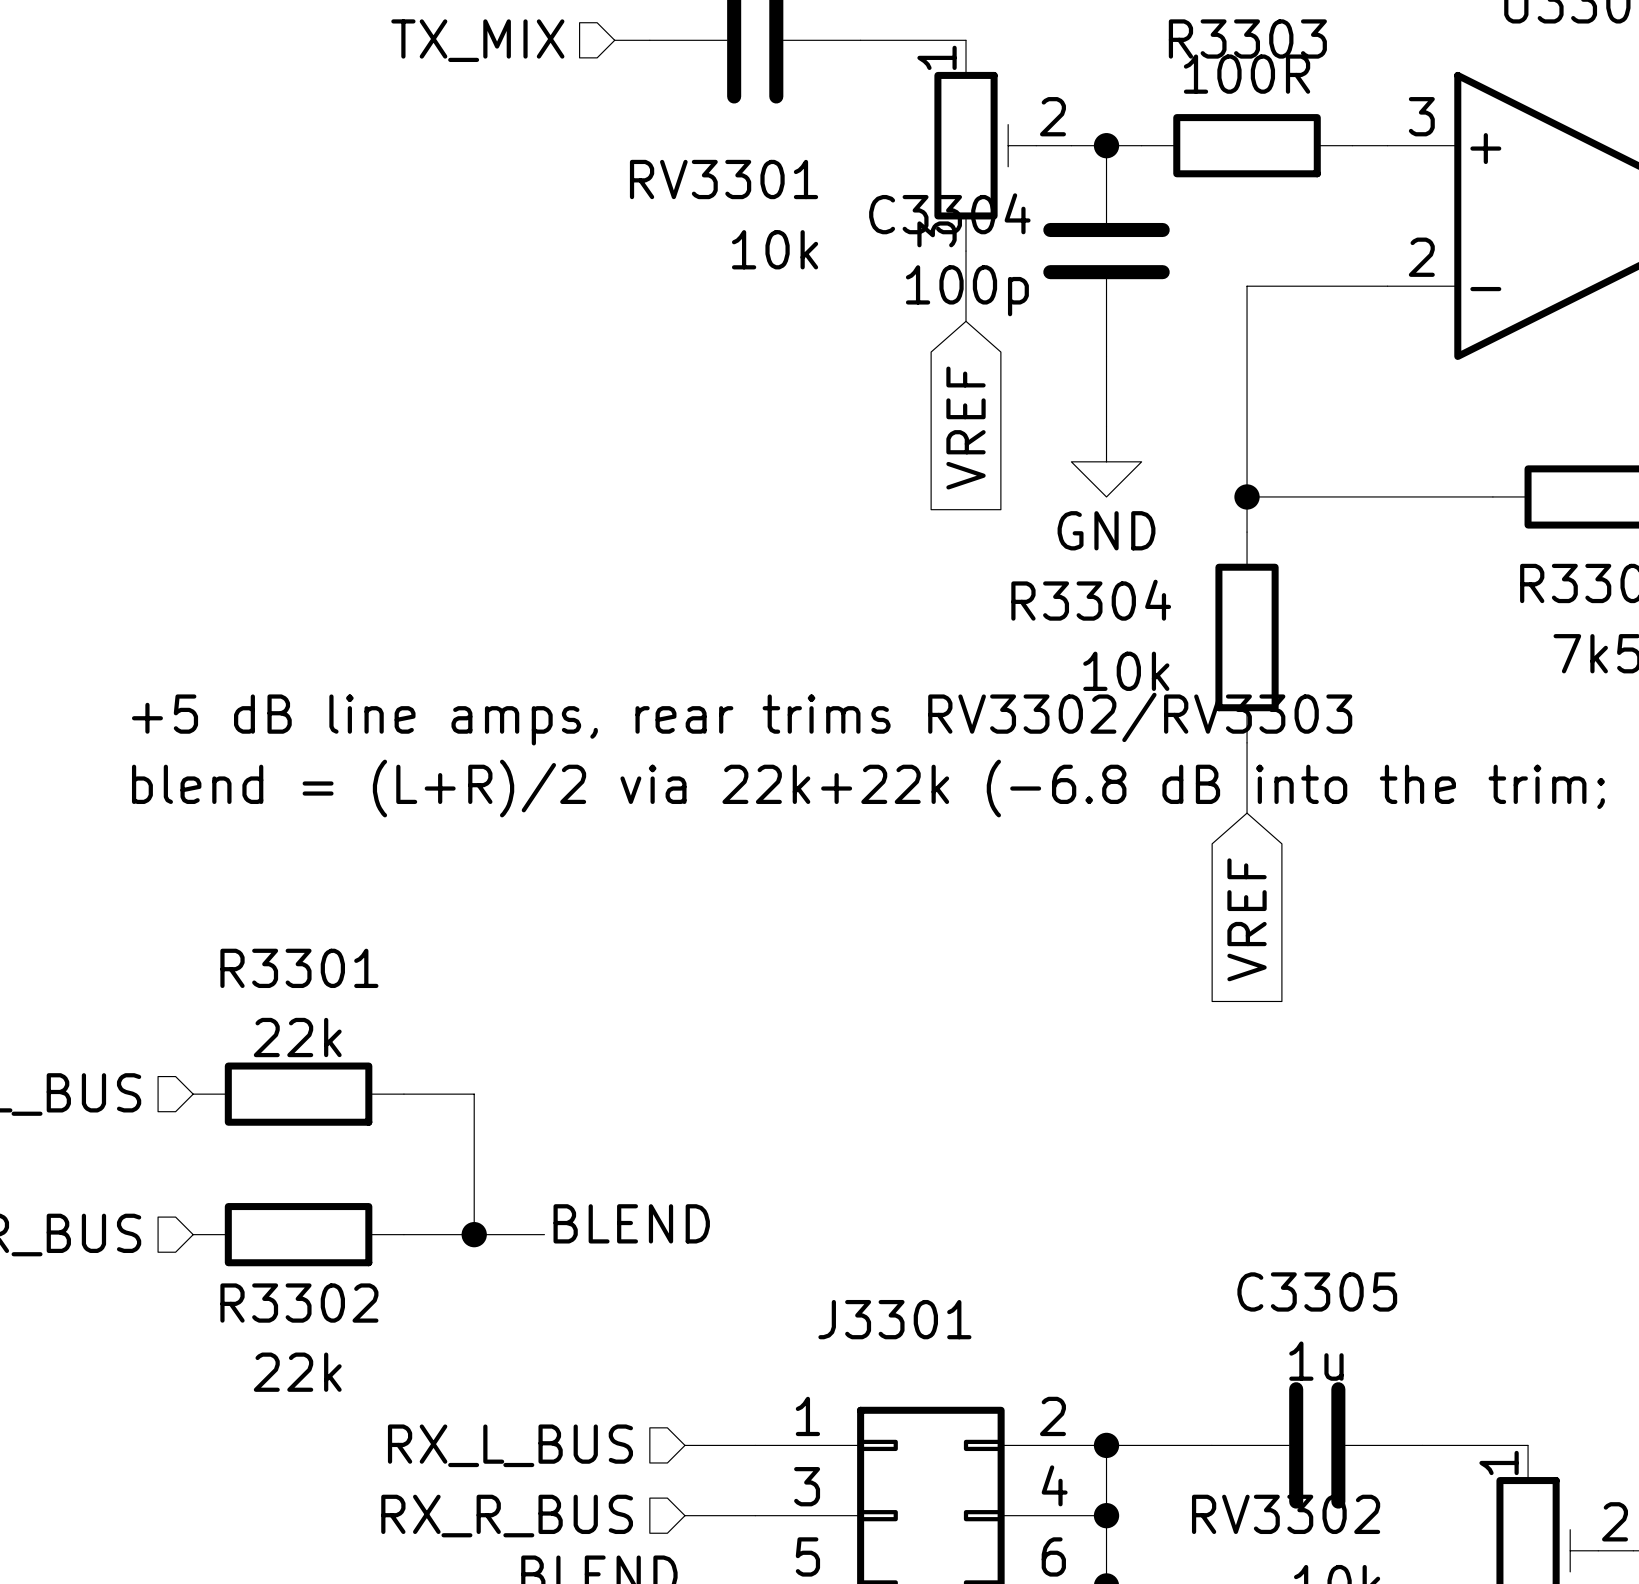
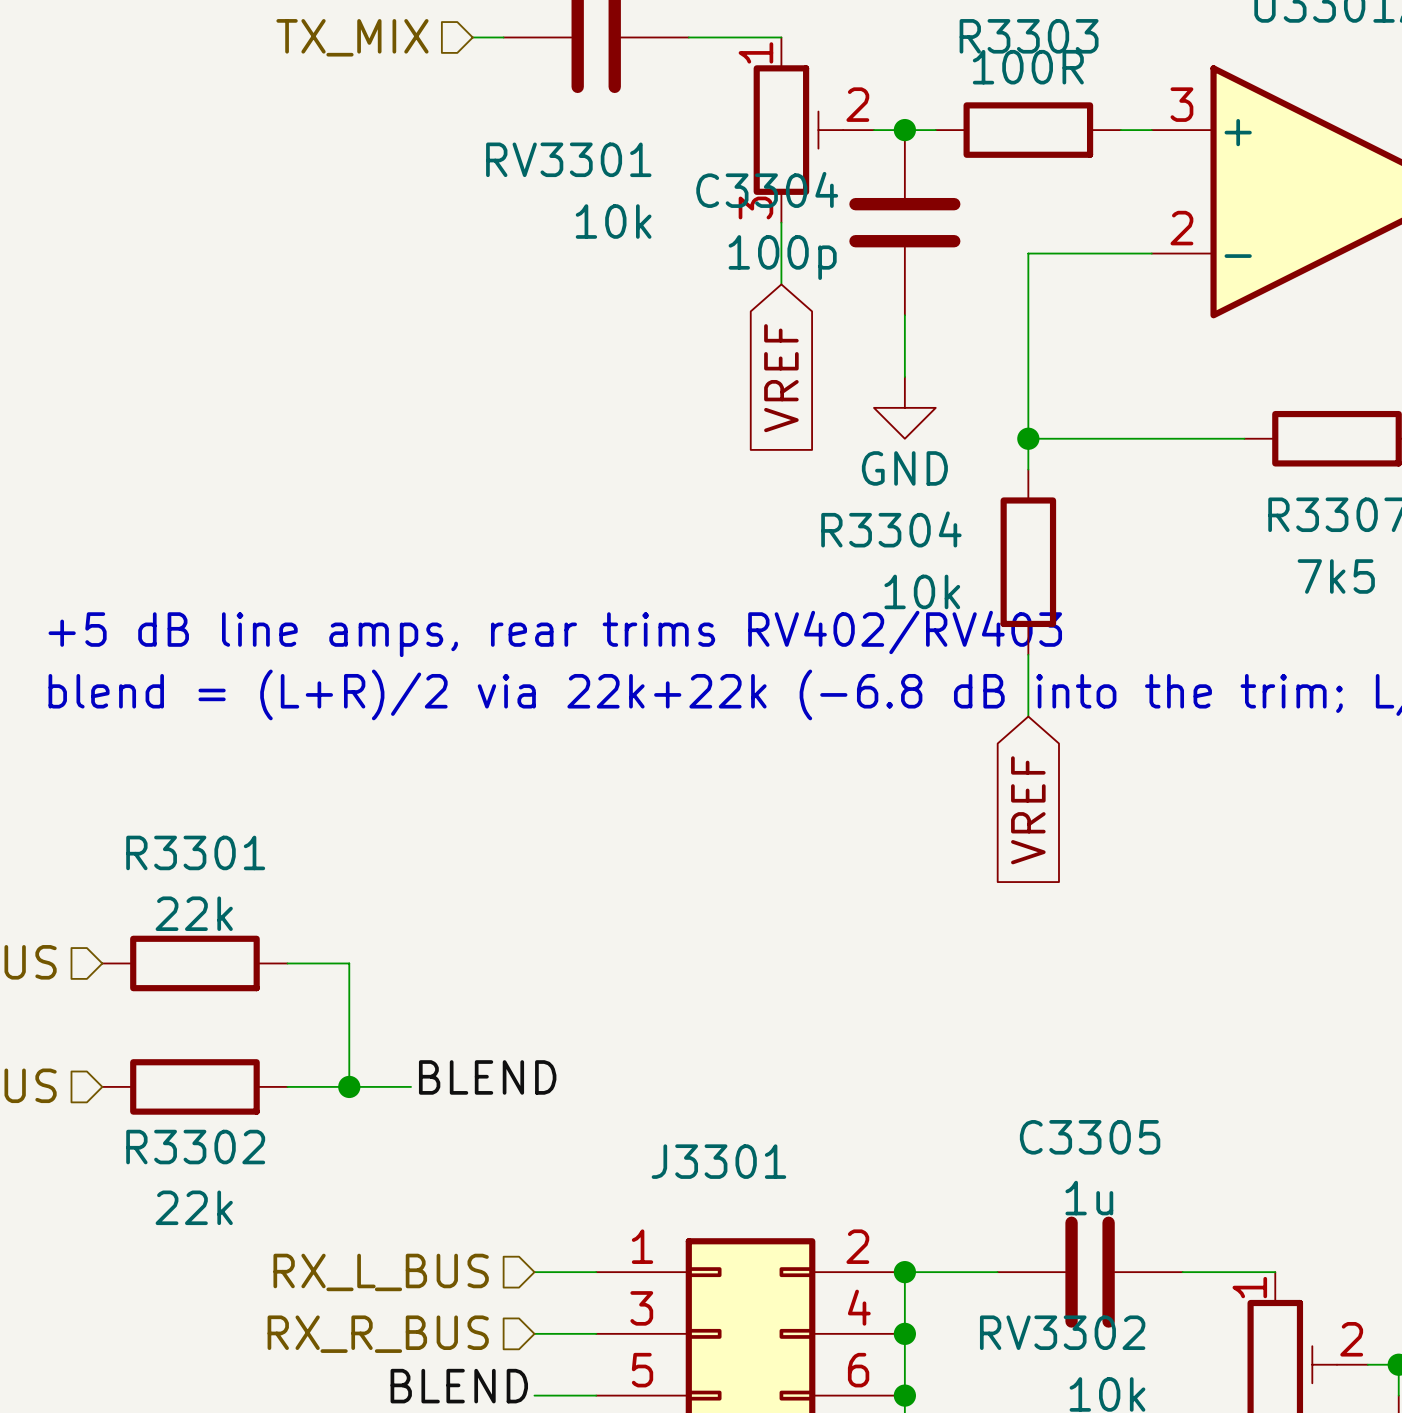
text: +5 dB line amps, rear trims RV3302/RV3303 (742, 719) -> +5 dB line amps, rear trims RV402/RV403 (555, 633)

